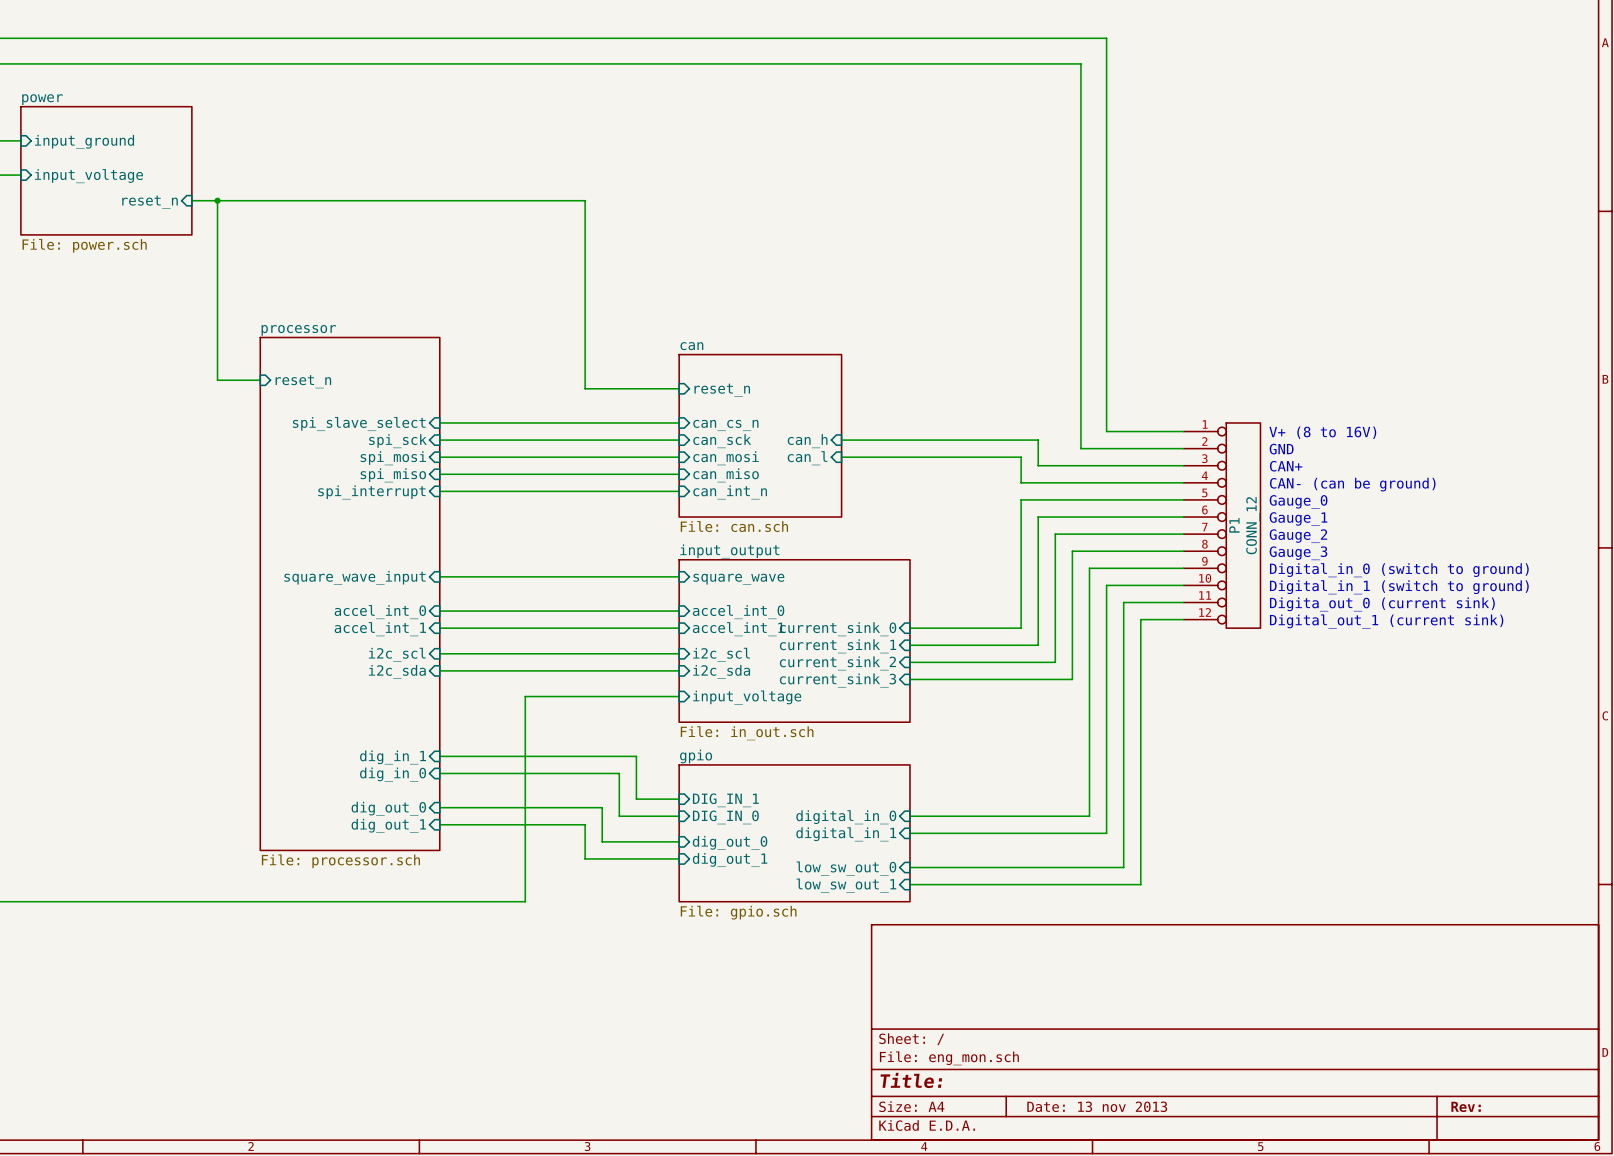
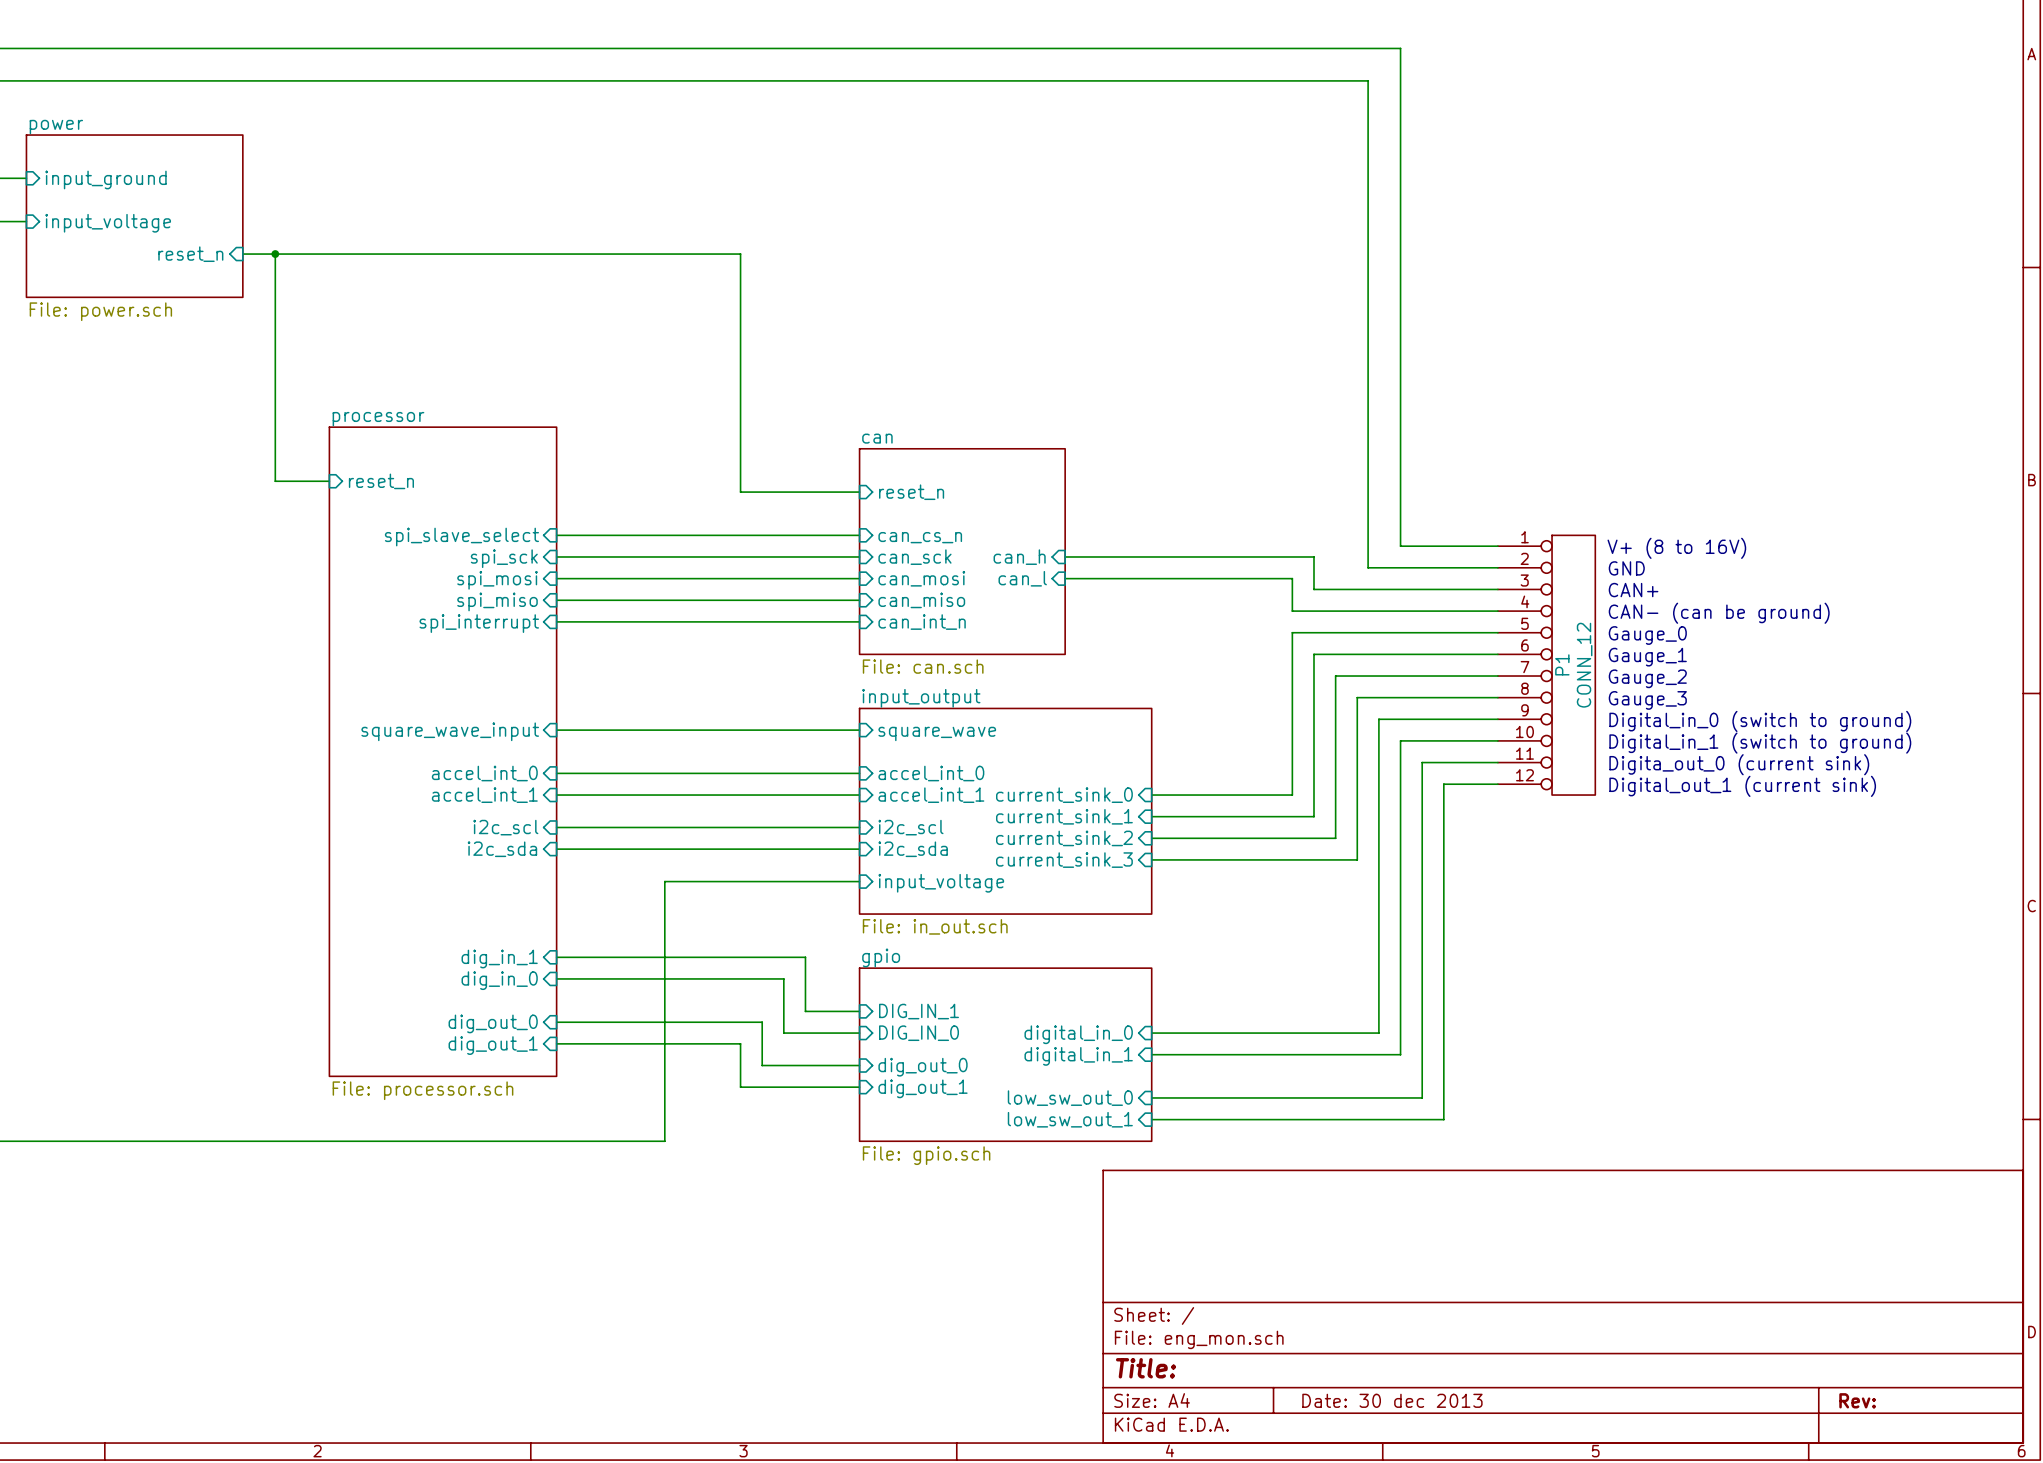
title block: Date: 13 nov 2013 (1097, 1106) -> Date: 30 dec 2013 (1392, 1400)

